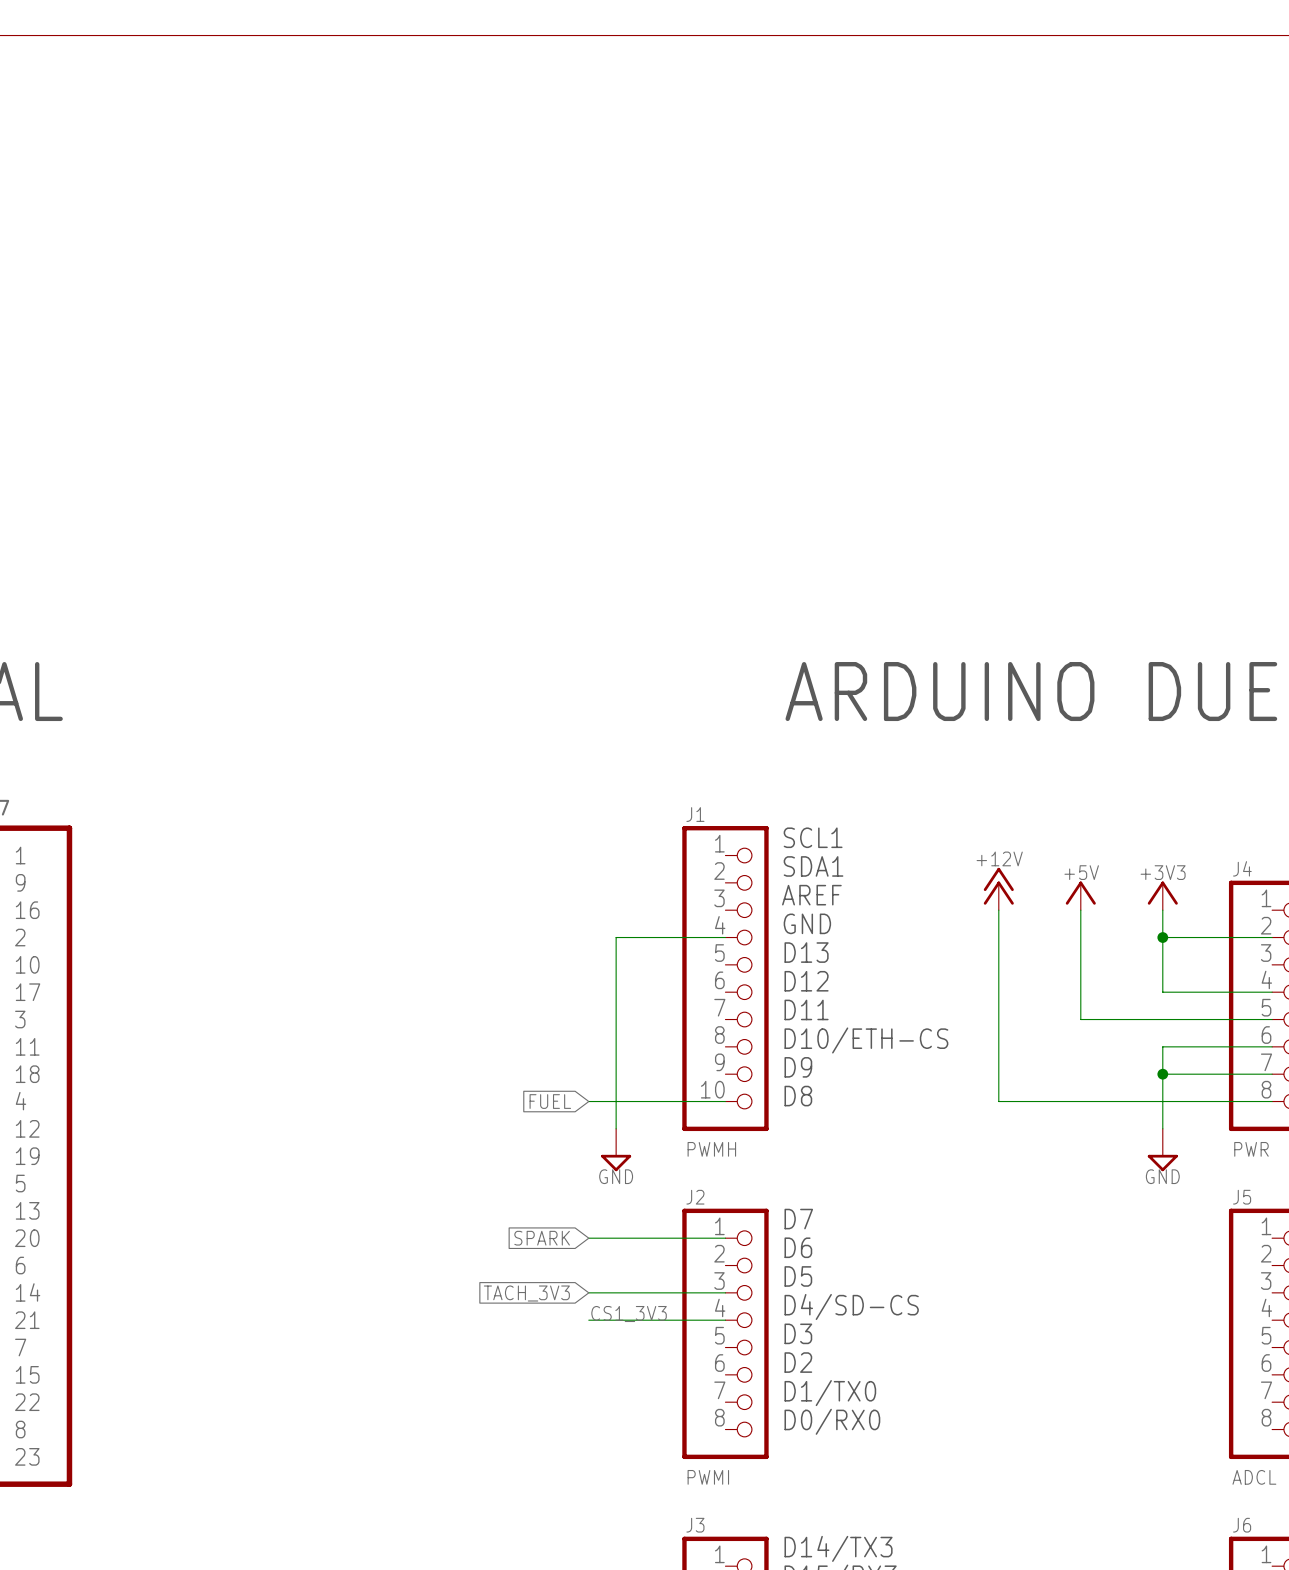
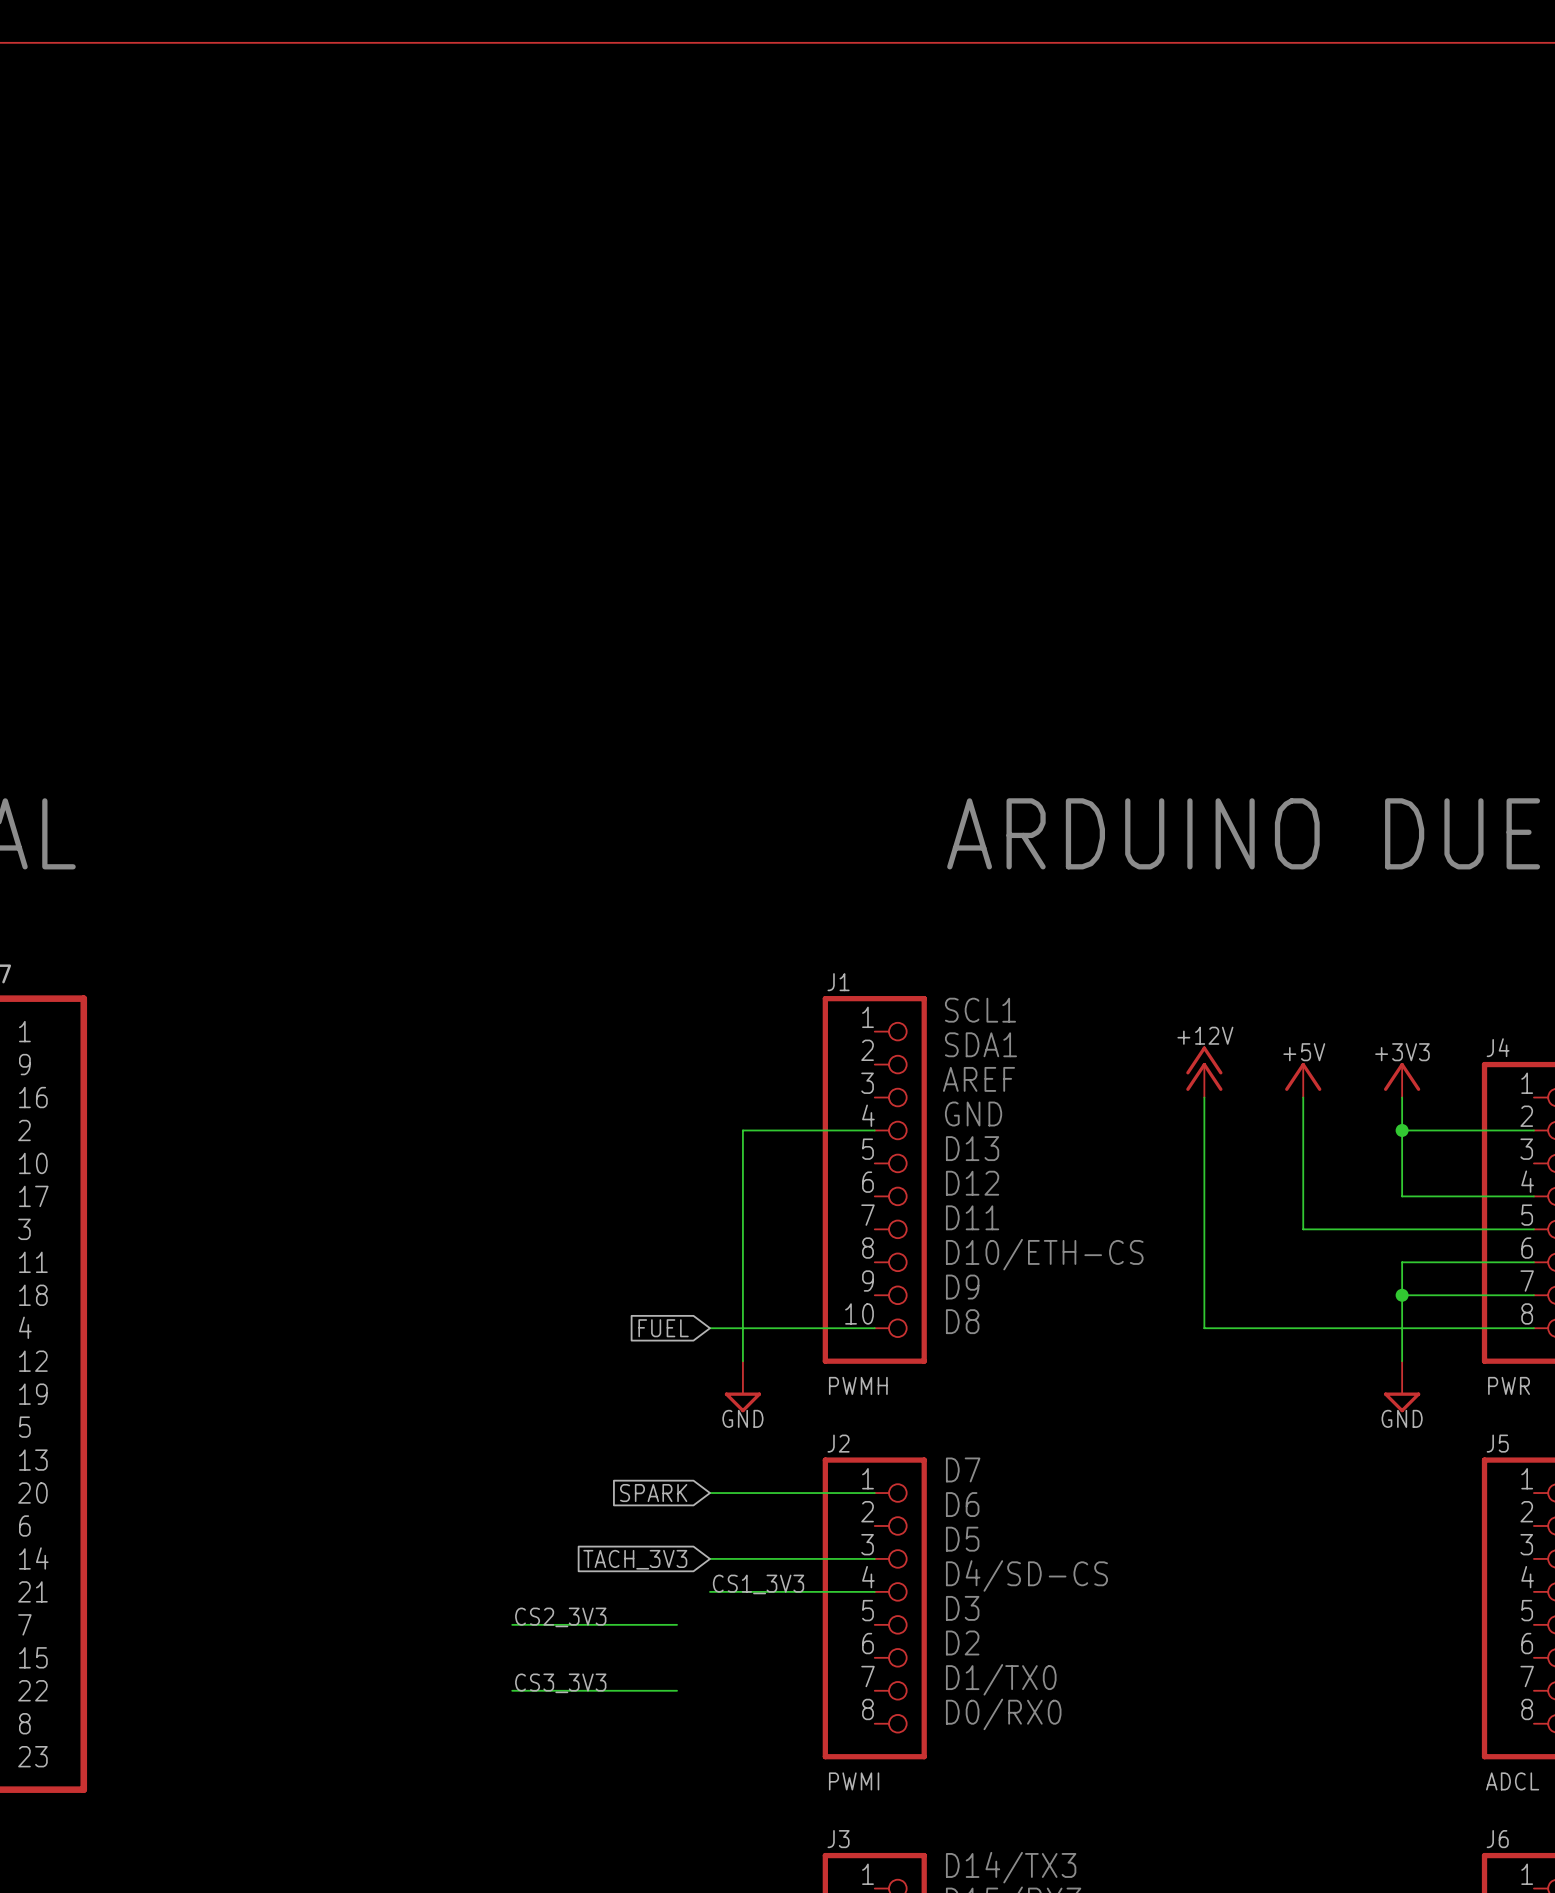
label: none -> CS2_3V3 (560, 1617)
wire: none -> (512, 1624) (677, 1624)
label: none -> CS3_3V3 (560, 1683)
wire: none -> (512, 1690) (677, 1690)

